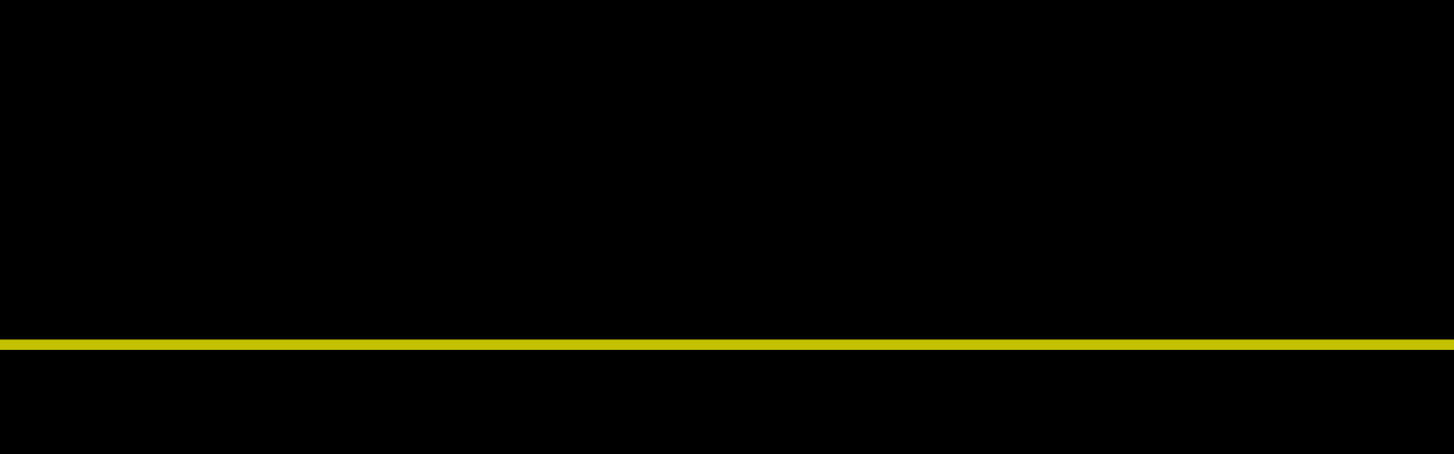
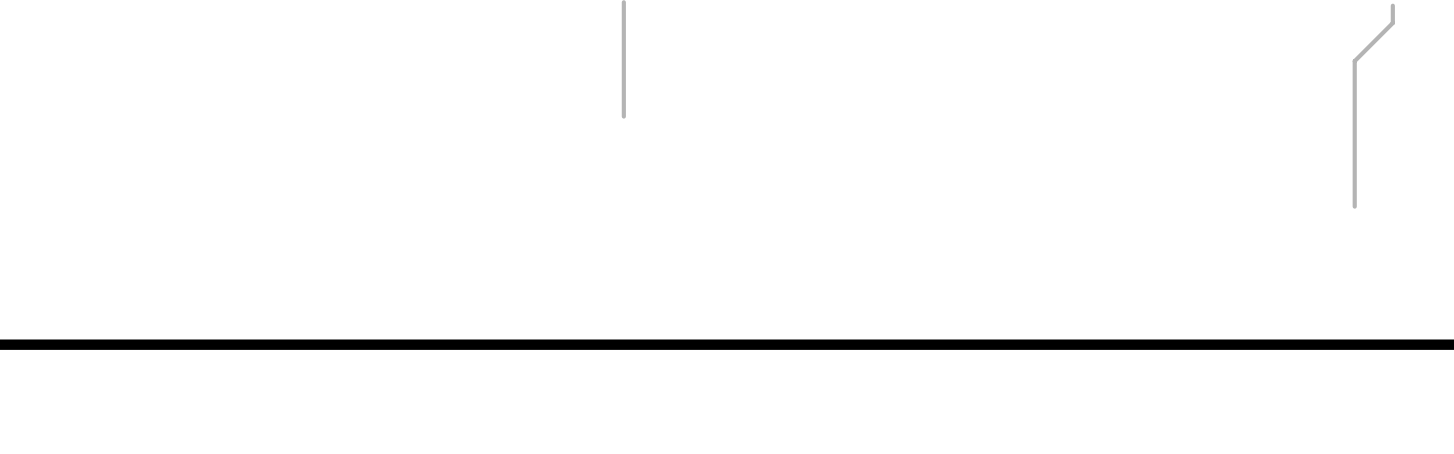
track: none -> (623, 2) (623, 116)
track: none -> (1392, 5) (1392, 23) (1354, 61) (1354, 206)

